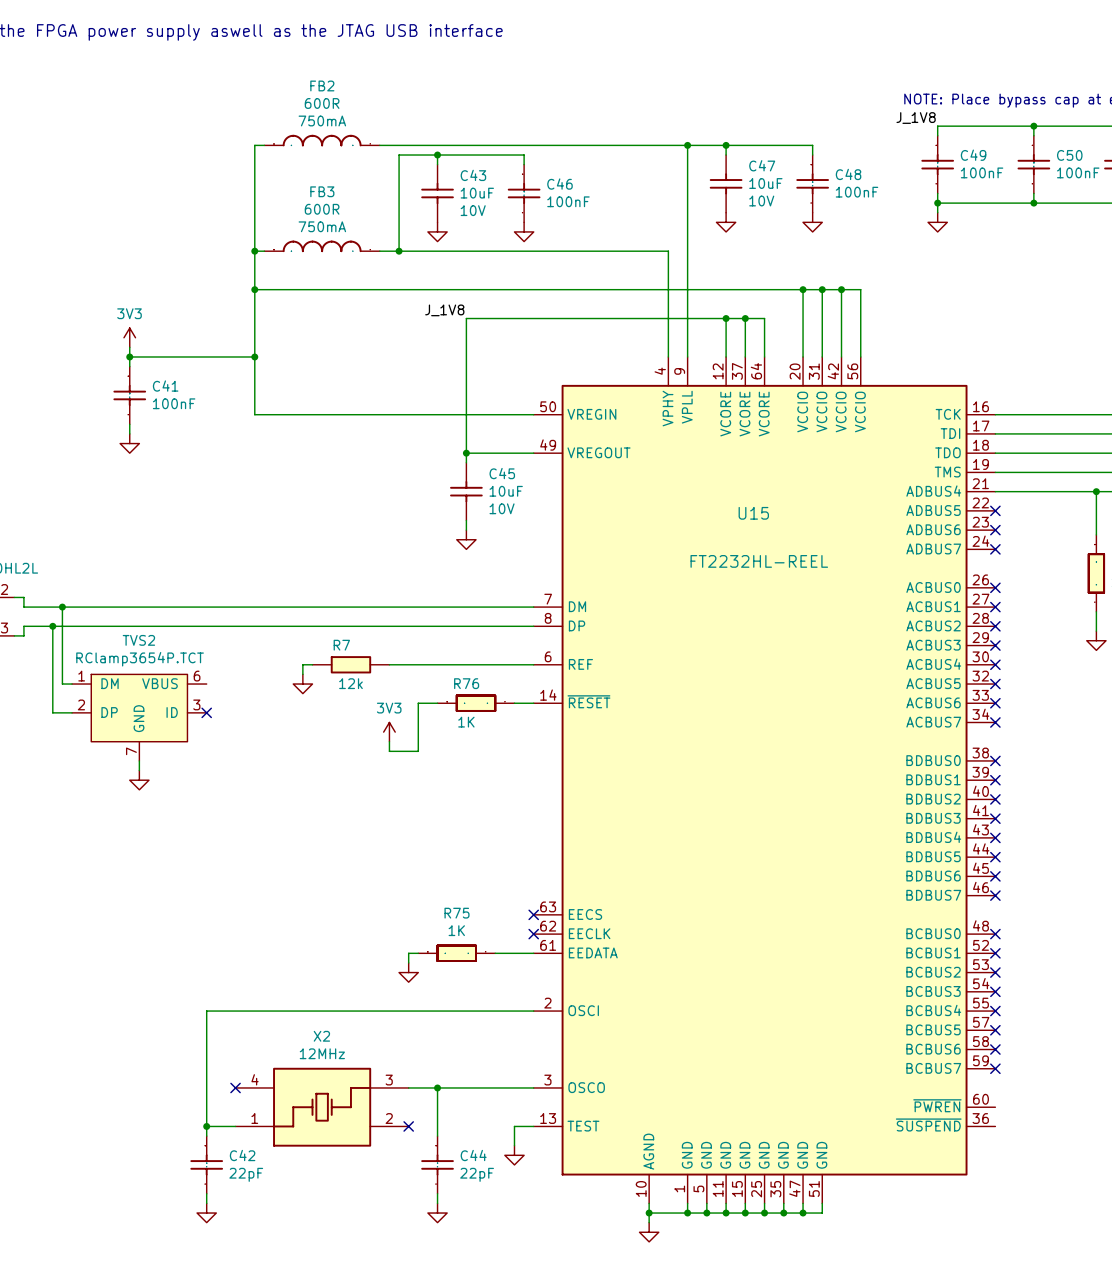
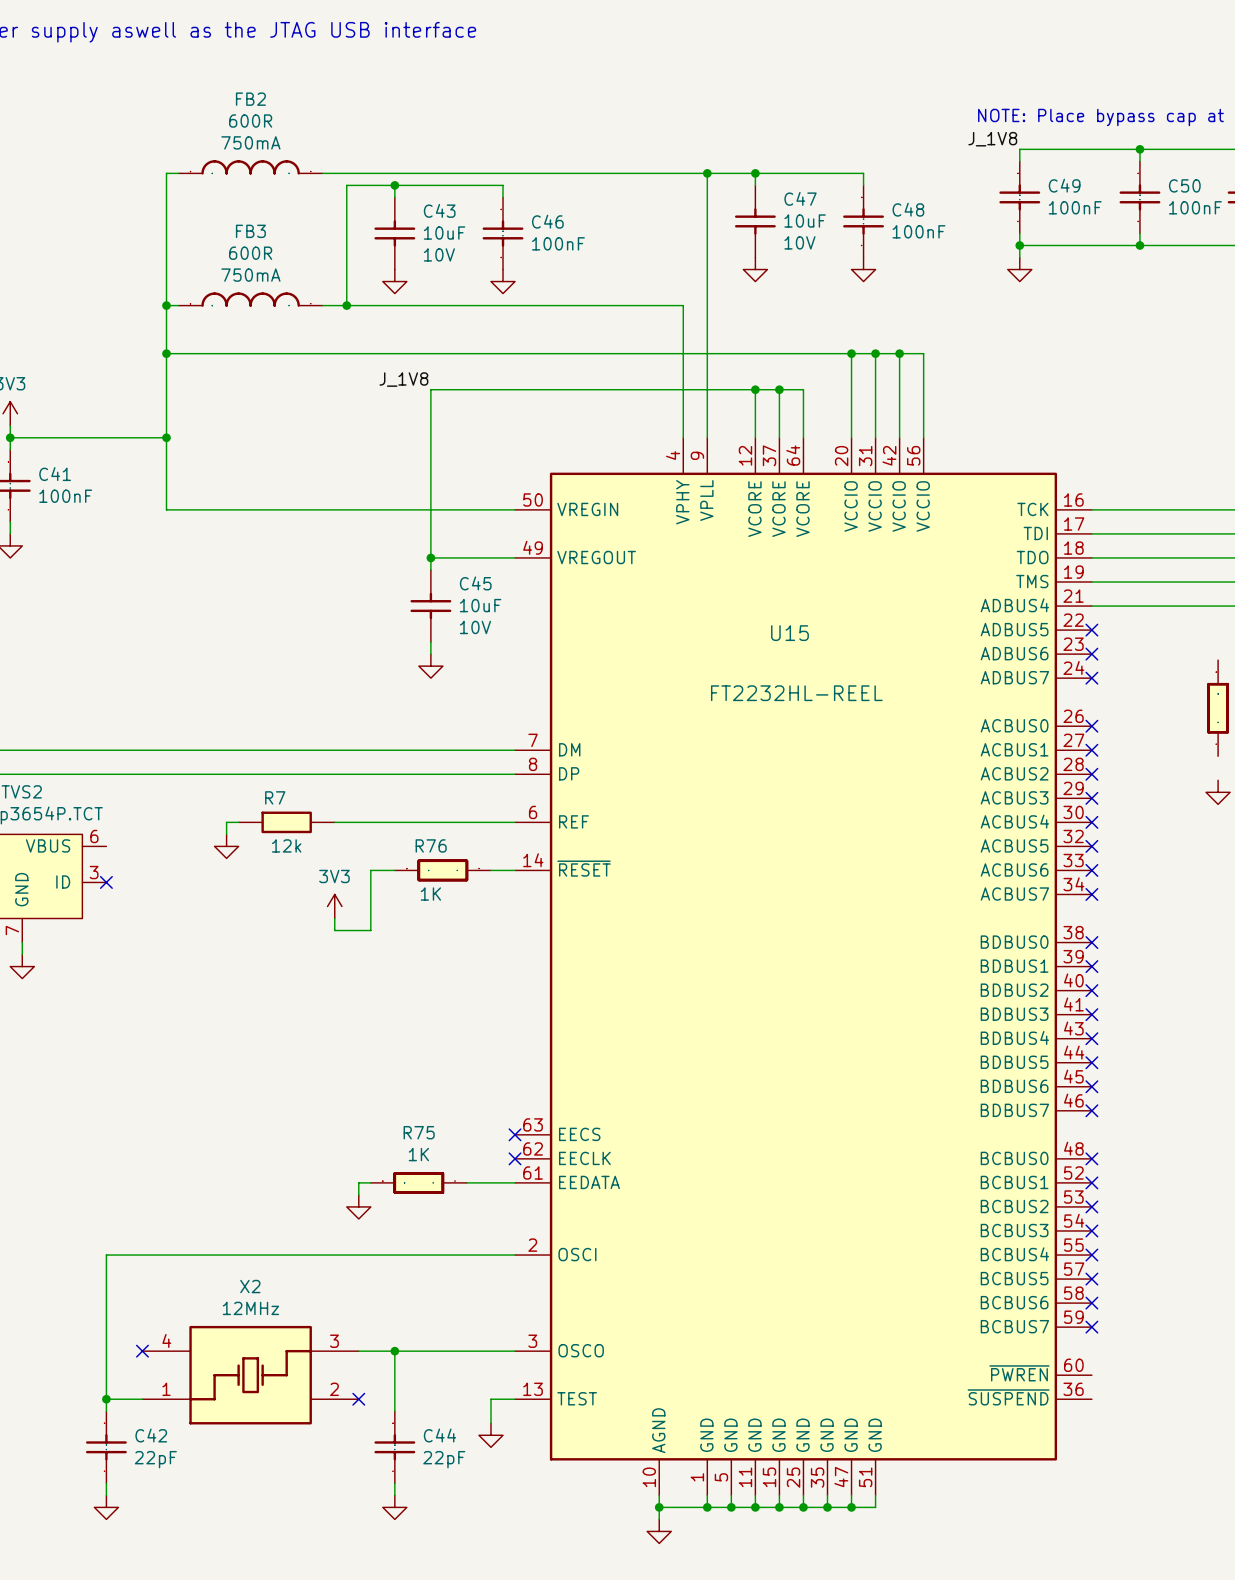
wire: (1096, 491) (1096, 534) -> none
junction: (1096, 491) -> none
wire: (1096, 611) (1096, 631) -> none

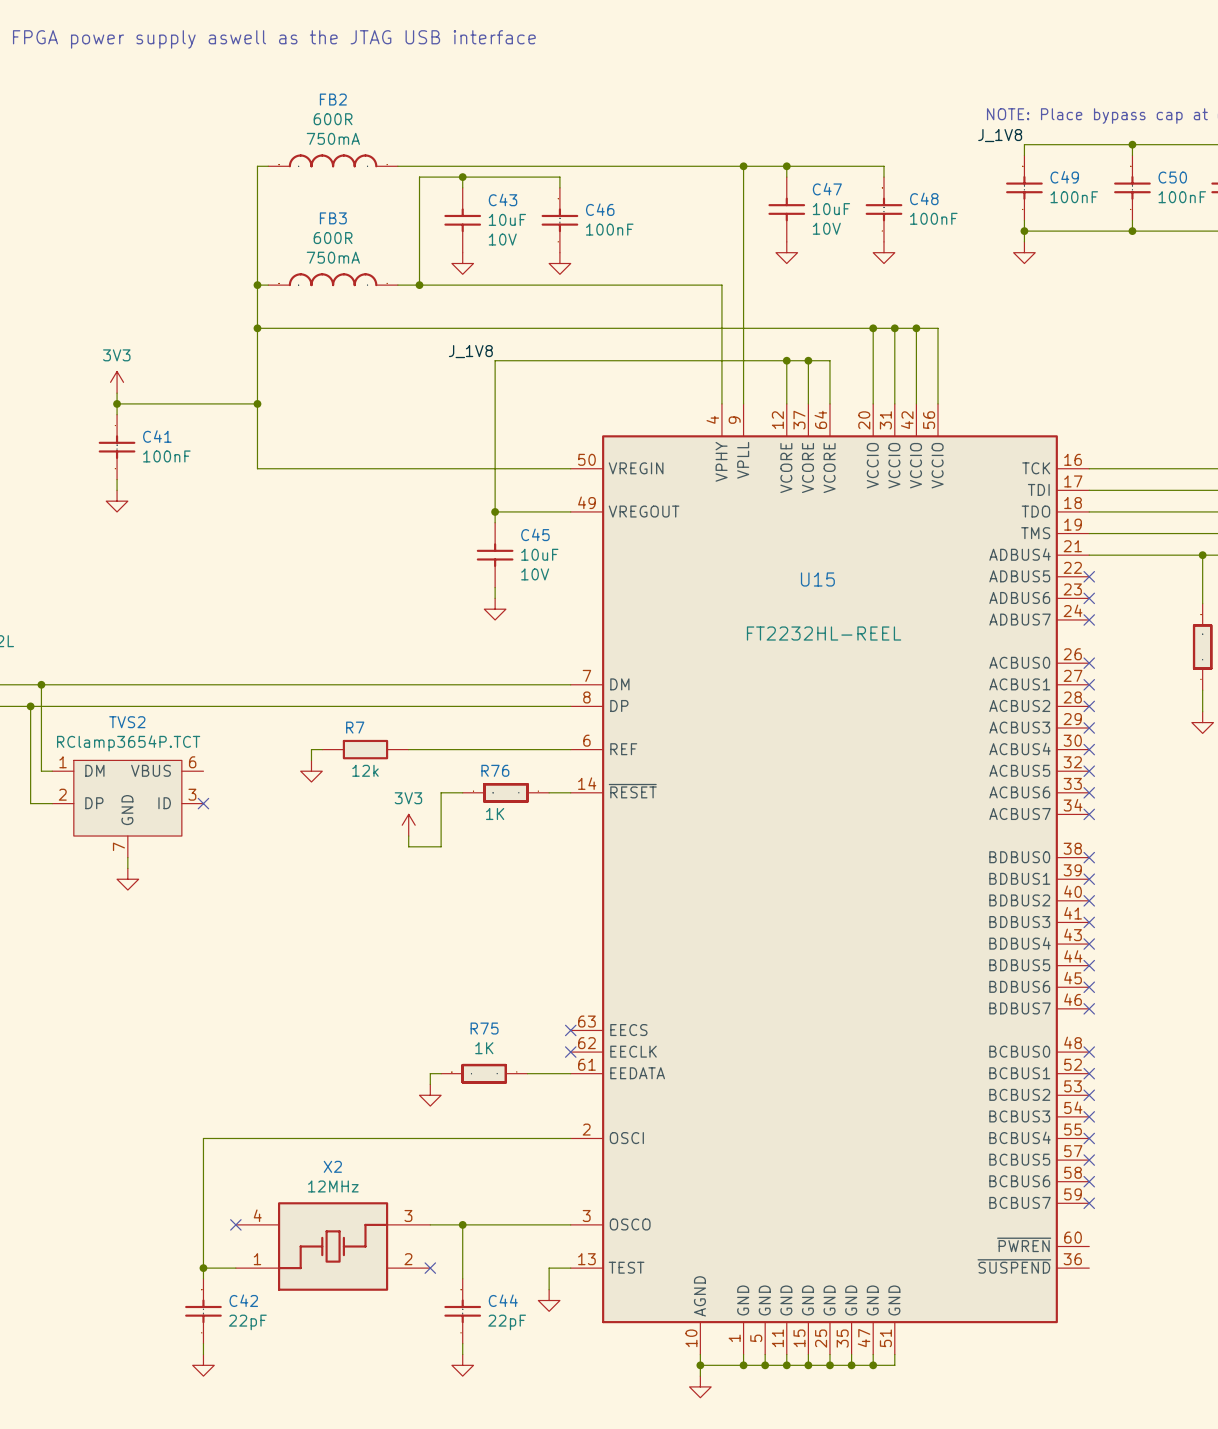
wire: none -> (1202, 555) (1202, 603)
junction: none -> (1202, 555)
wire: none -> (1202, 690) (1202, 711)

